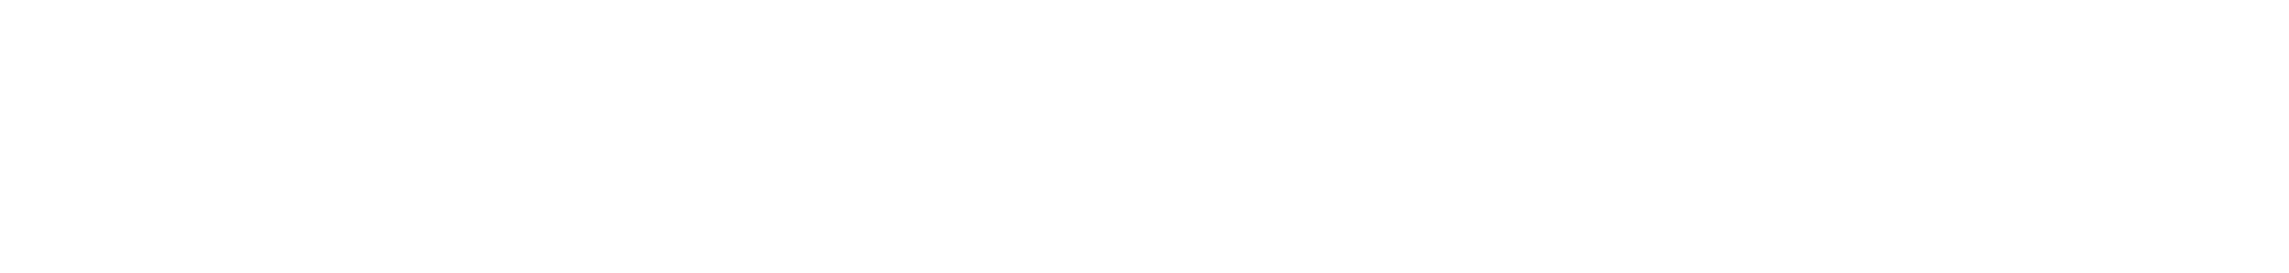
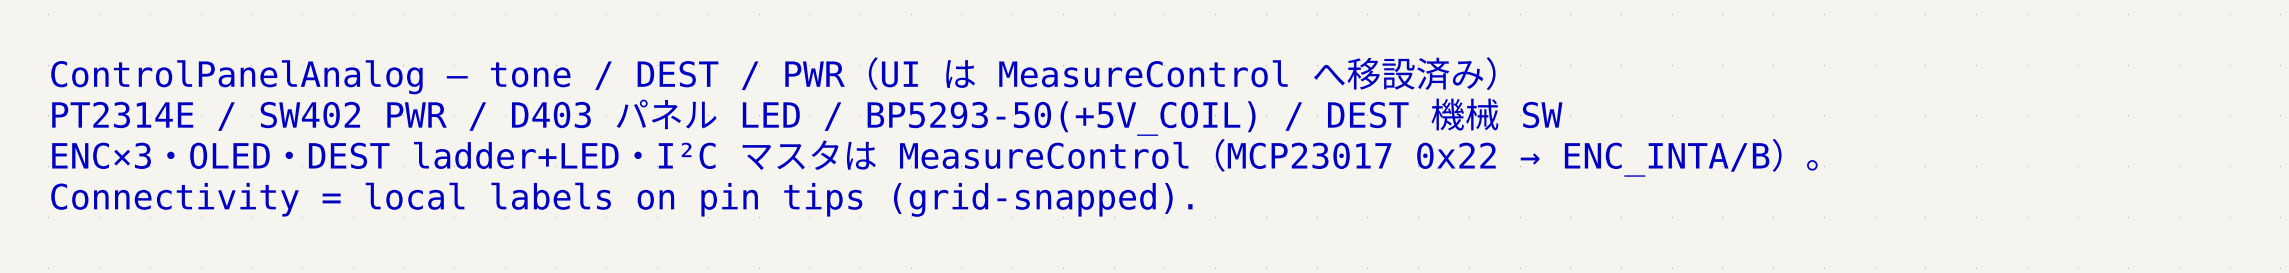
text: none -> ControlPanelAnalog — tone / DEST / PWR（UI は MeasureControl へ移設済み） (773, 75)
text: none -> PT2314E / SW402 PWR / D403 パネル LED / BP5293-50(+5V_COIL) / DEST 機械 SW (807, 117)
text: none -> ENC×3・OLED・DEST ladder+LED・I²C マスタは MeasureControl（MCP23017 0x22 → ENC_INTA/B）。 (934, 157)
text: none -> Connectivity = local labels on pin tips (grid-snapped). (621, 199)

